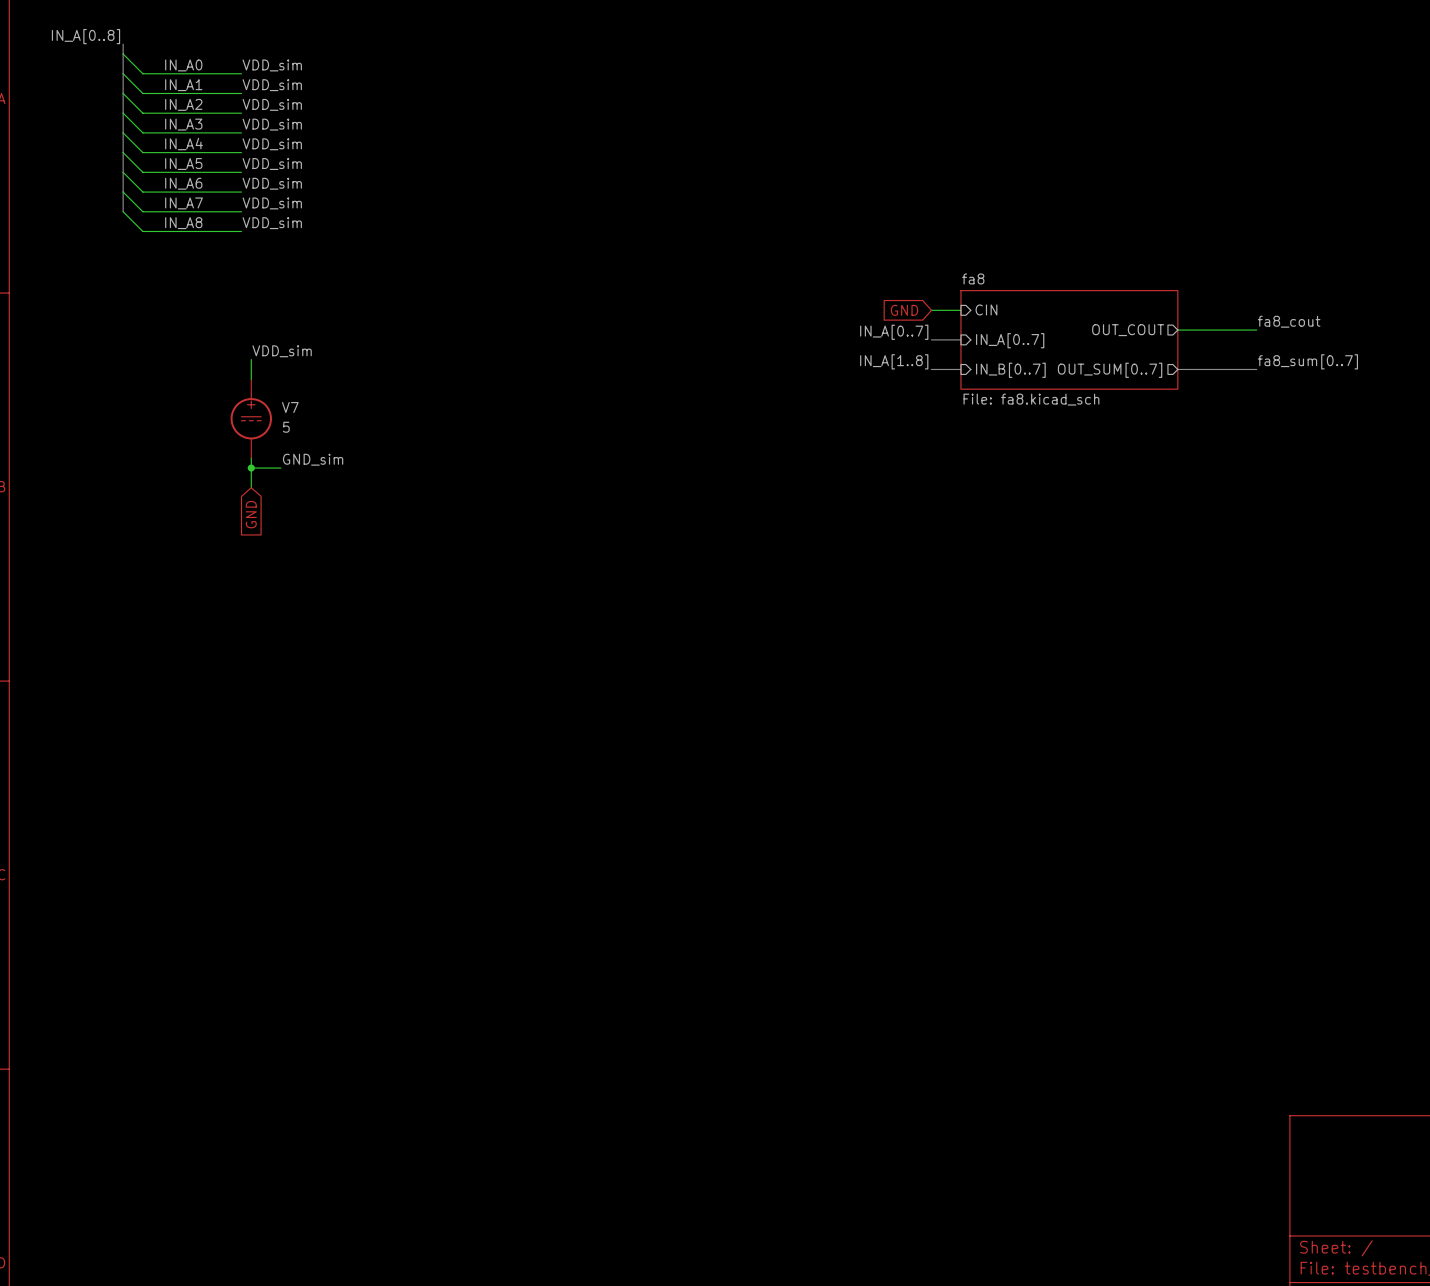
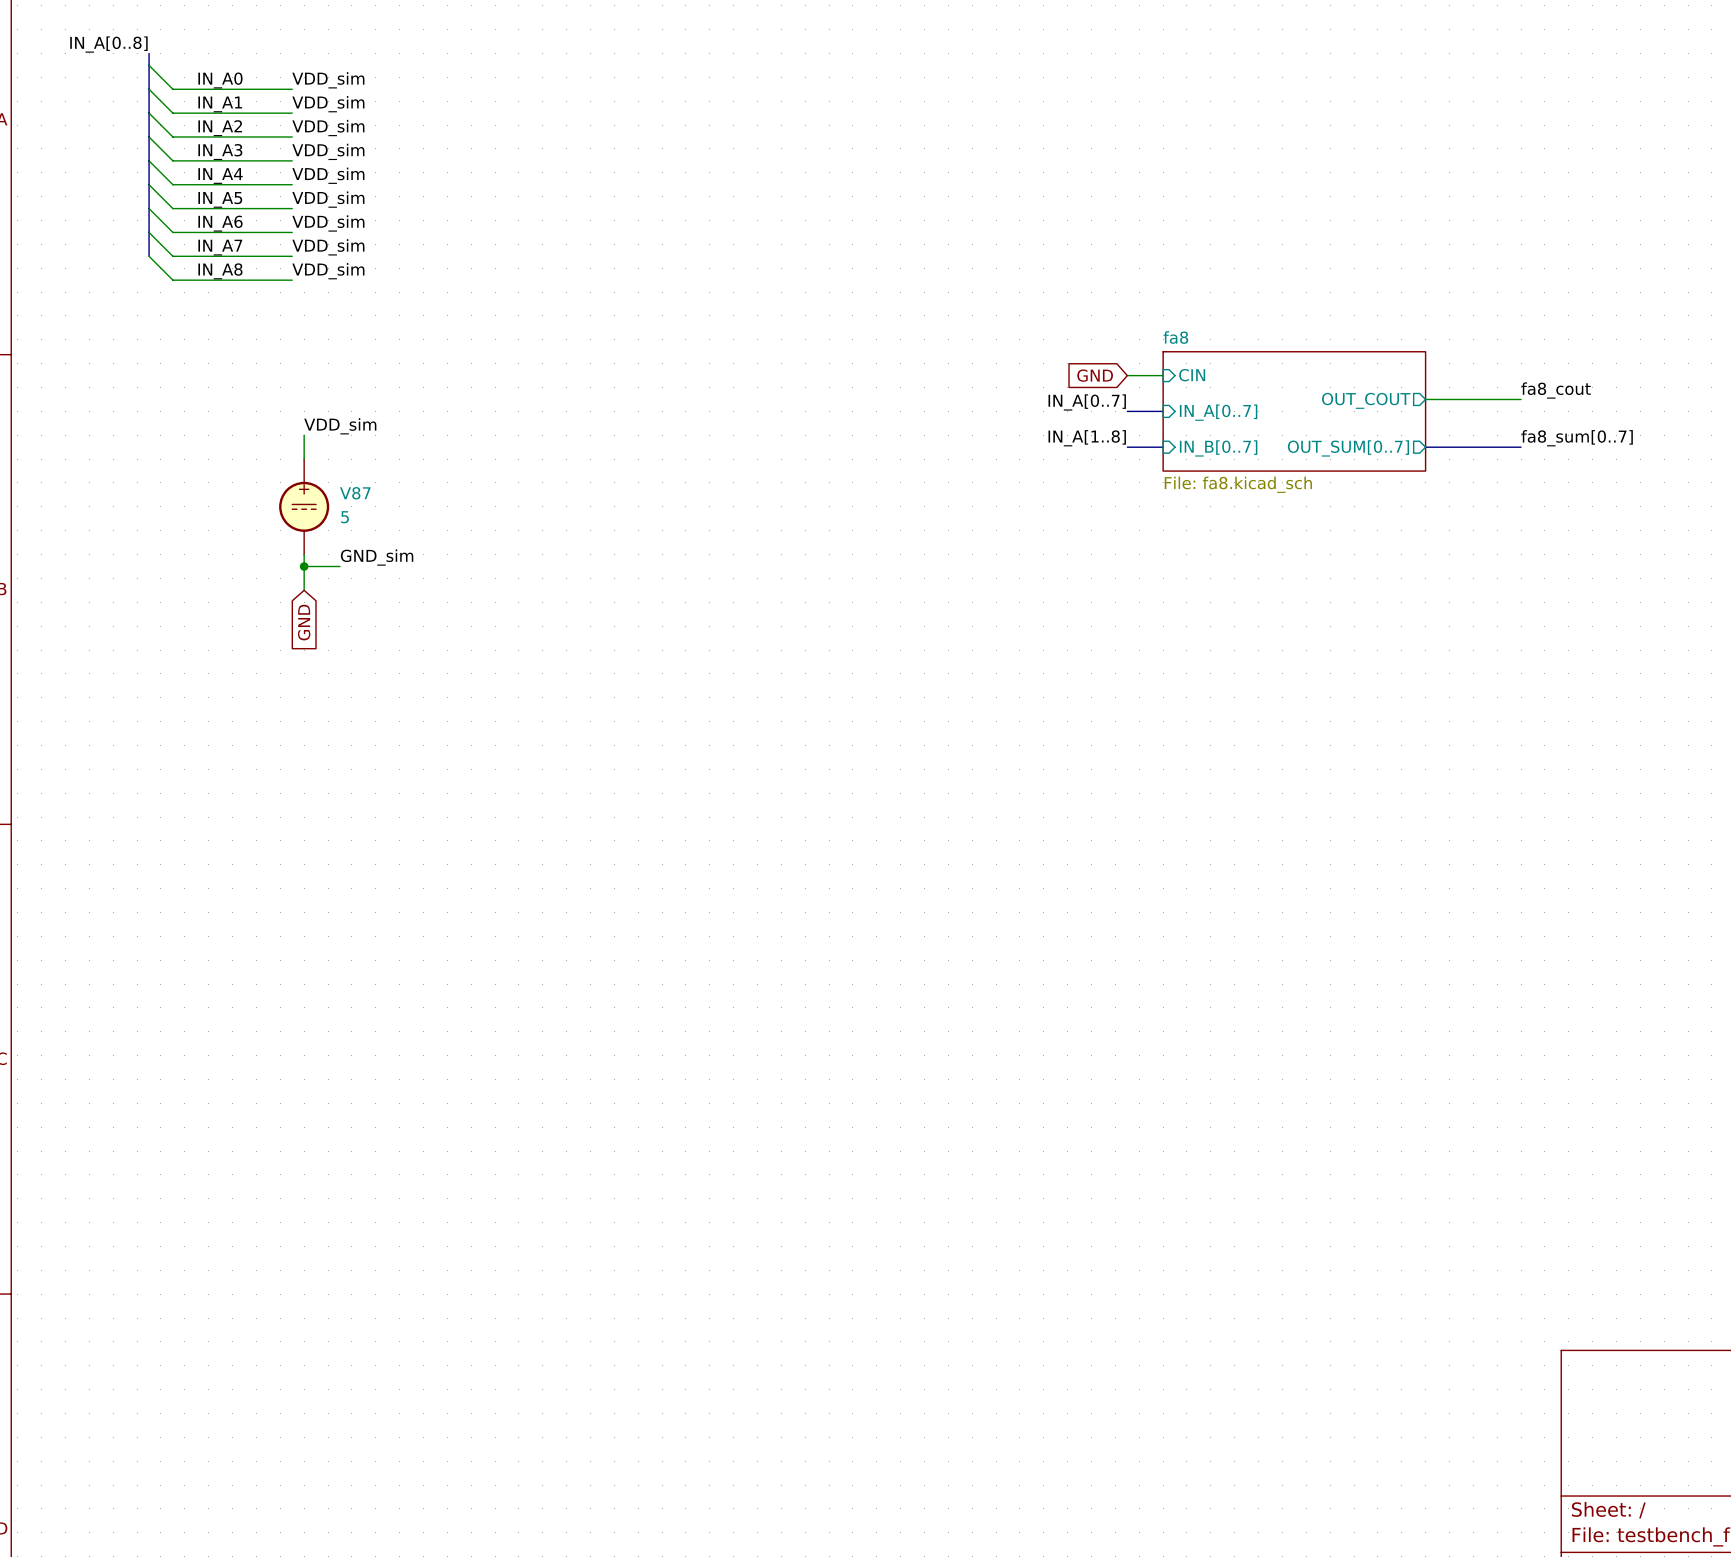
V7 name: V7 (290, 407) -> V87 (355, 493)

